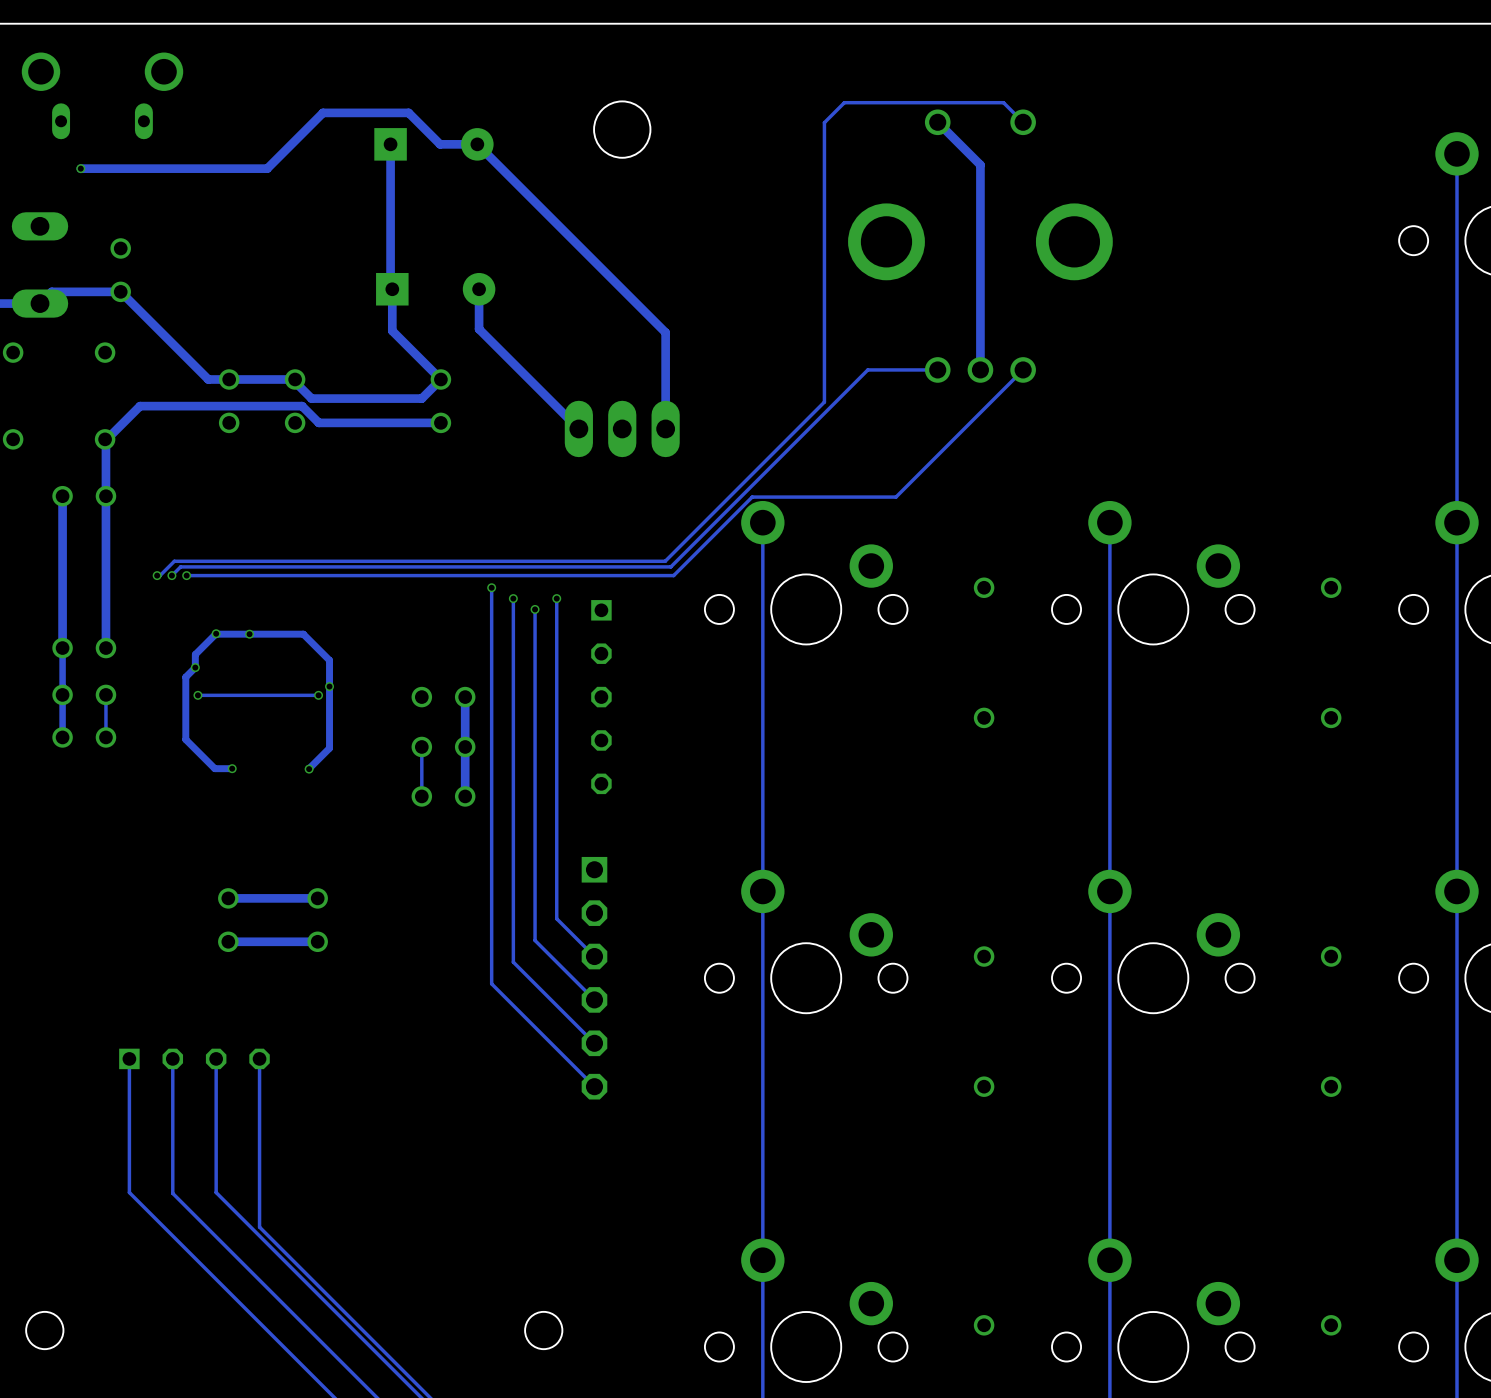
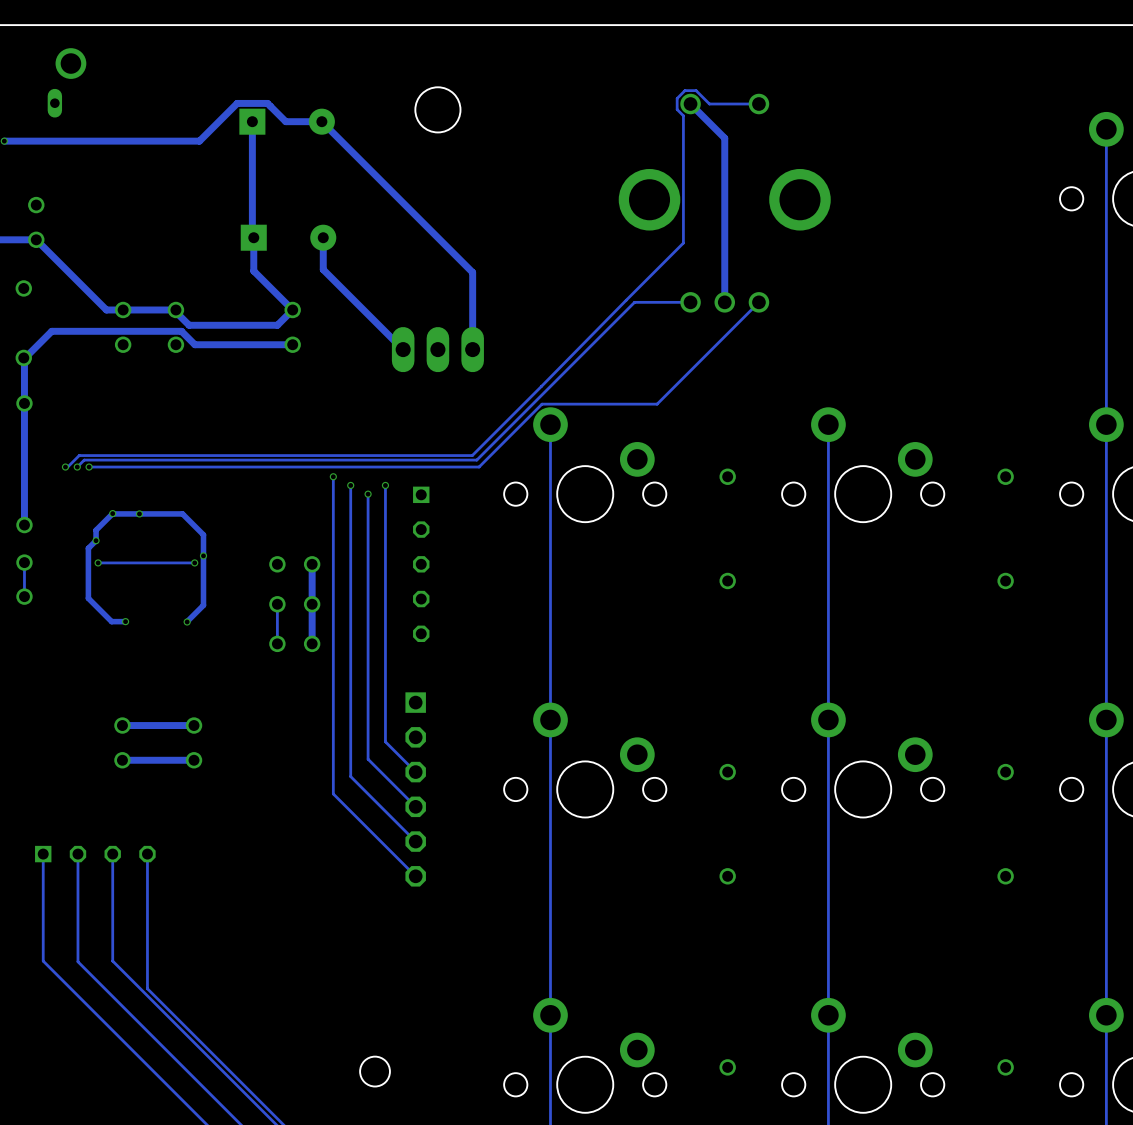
track: (1023, 122) (1003, 102) (844, 102) (824, 122) (824, 402) (751, 474) -> (758, 104) (709, 104) (696, 90) (685, 90) (677, 98) (677, 109) (683, 115) (683, 243) (541, 386)
track: (440, 144) (408, 112) (323, 112) (267, 168) -> (292, 121) (285, 121) (267, 103) (237, 103) (199, 141) (153, 141)

